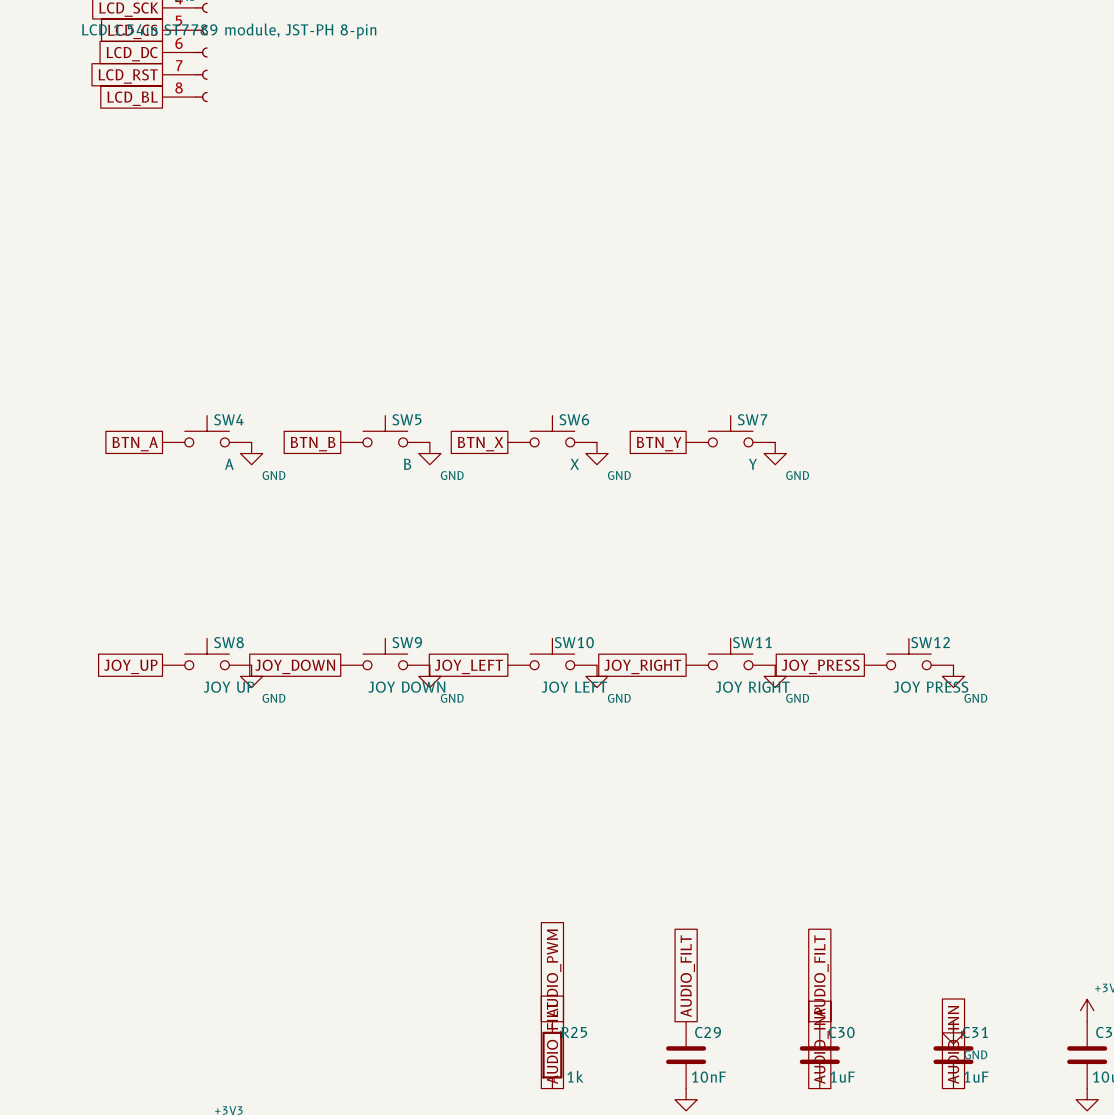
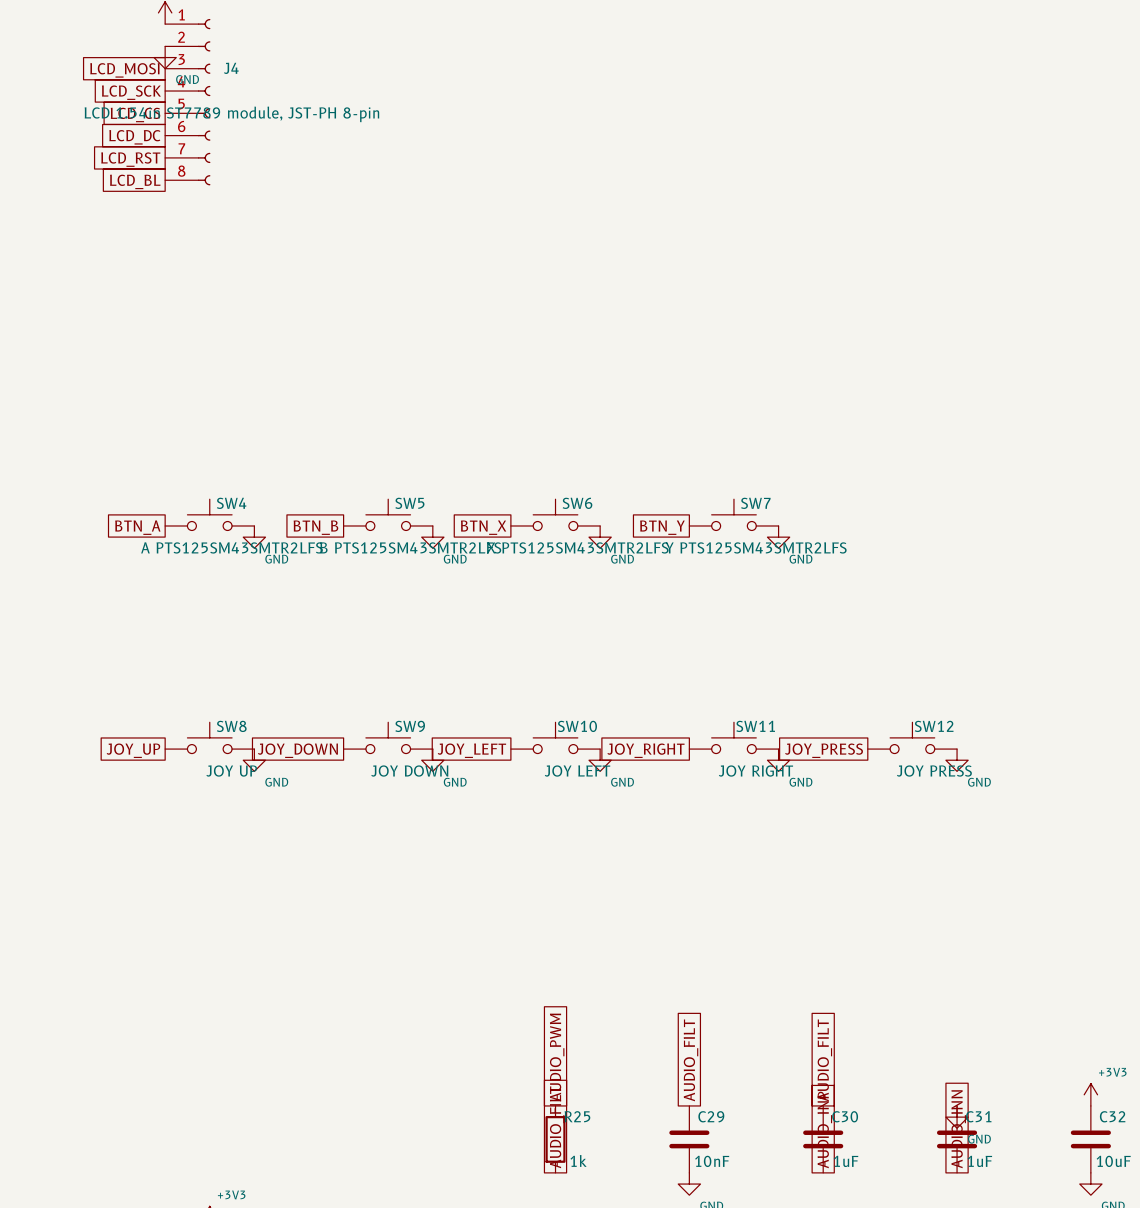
SW4 value: A (229, 464) -> A PTS125SM43SMTR2LFS (231, 547)
SW5 value: B (407, 464) -> B PTS125SM43SMTR2LFS (410, 547)
SW6 value: X (574, 464) -> X PTS125SM43SMTR2LFS (577, 547)
SW7 value: Y (752, 464) -> Y PTS125SM43SMTR2LFS (756, 547)

